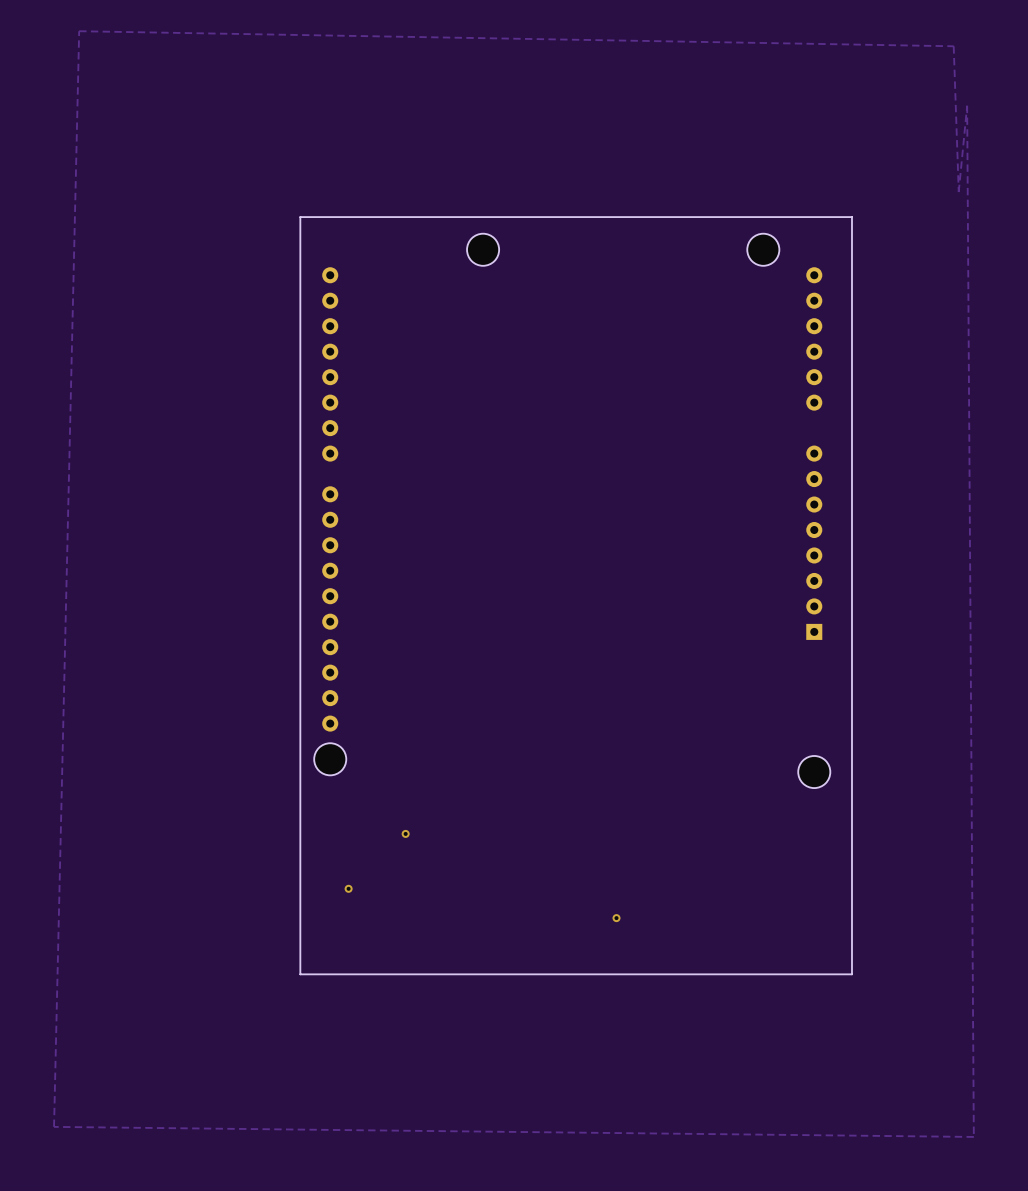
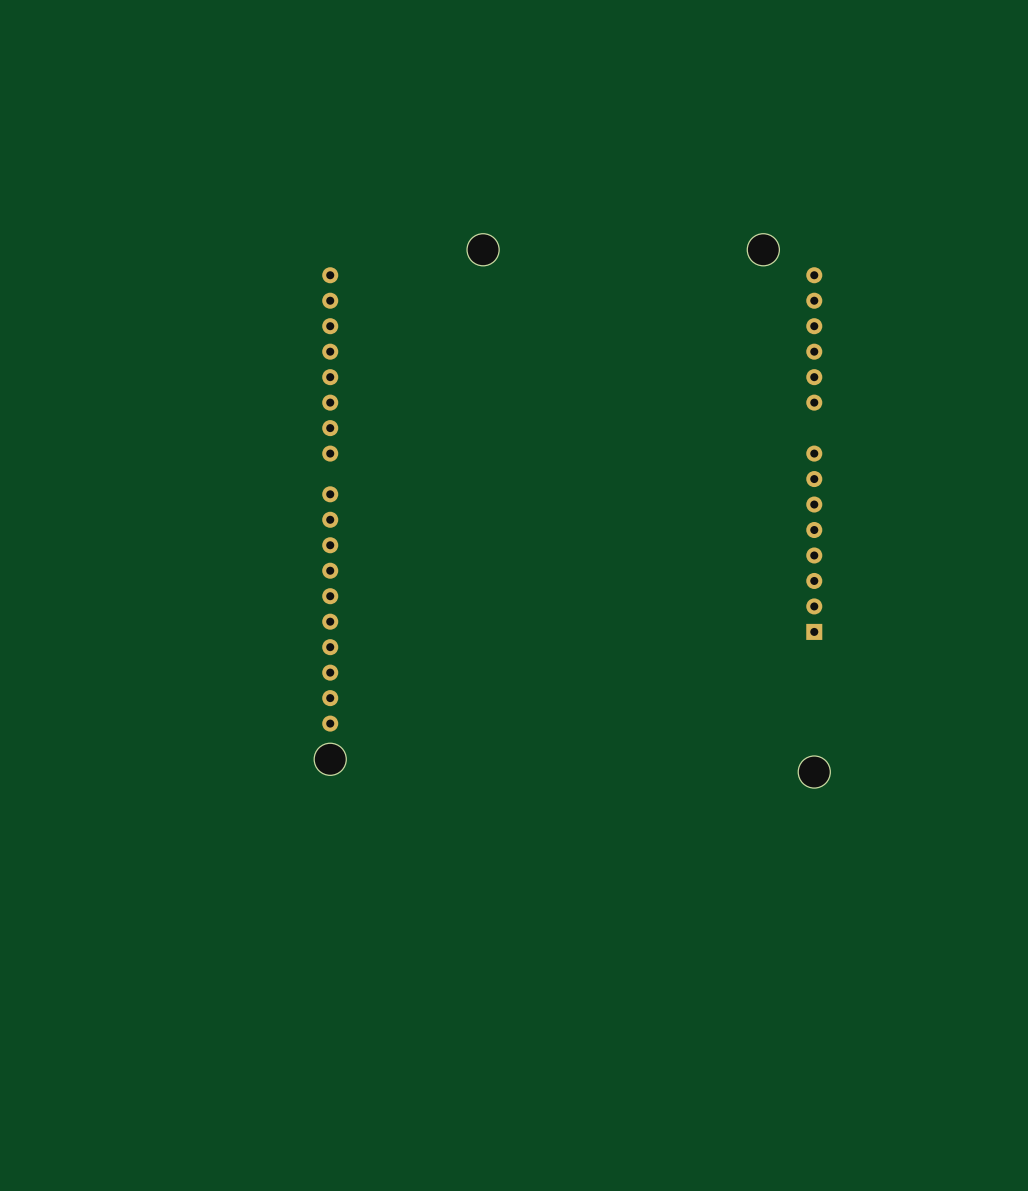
zone outline: (79, 31) (54, 1126) (973, 1136) (967, 105) (958, 192) (953, 46) (79, 31) -> none
board edge: (851, 217) (300, 217) (300, 974) (851, 974) (851, 217) -> none
via: (405, 833) -> none
via: (348, 888) -> none
via: (616, 918) -> none

